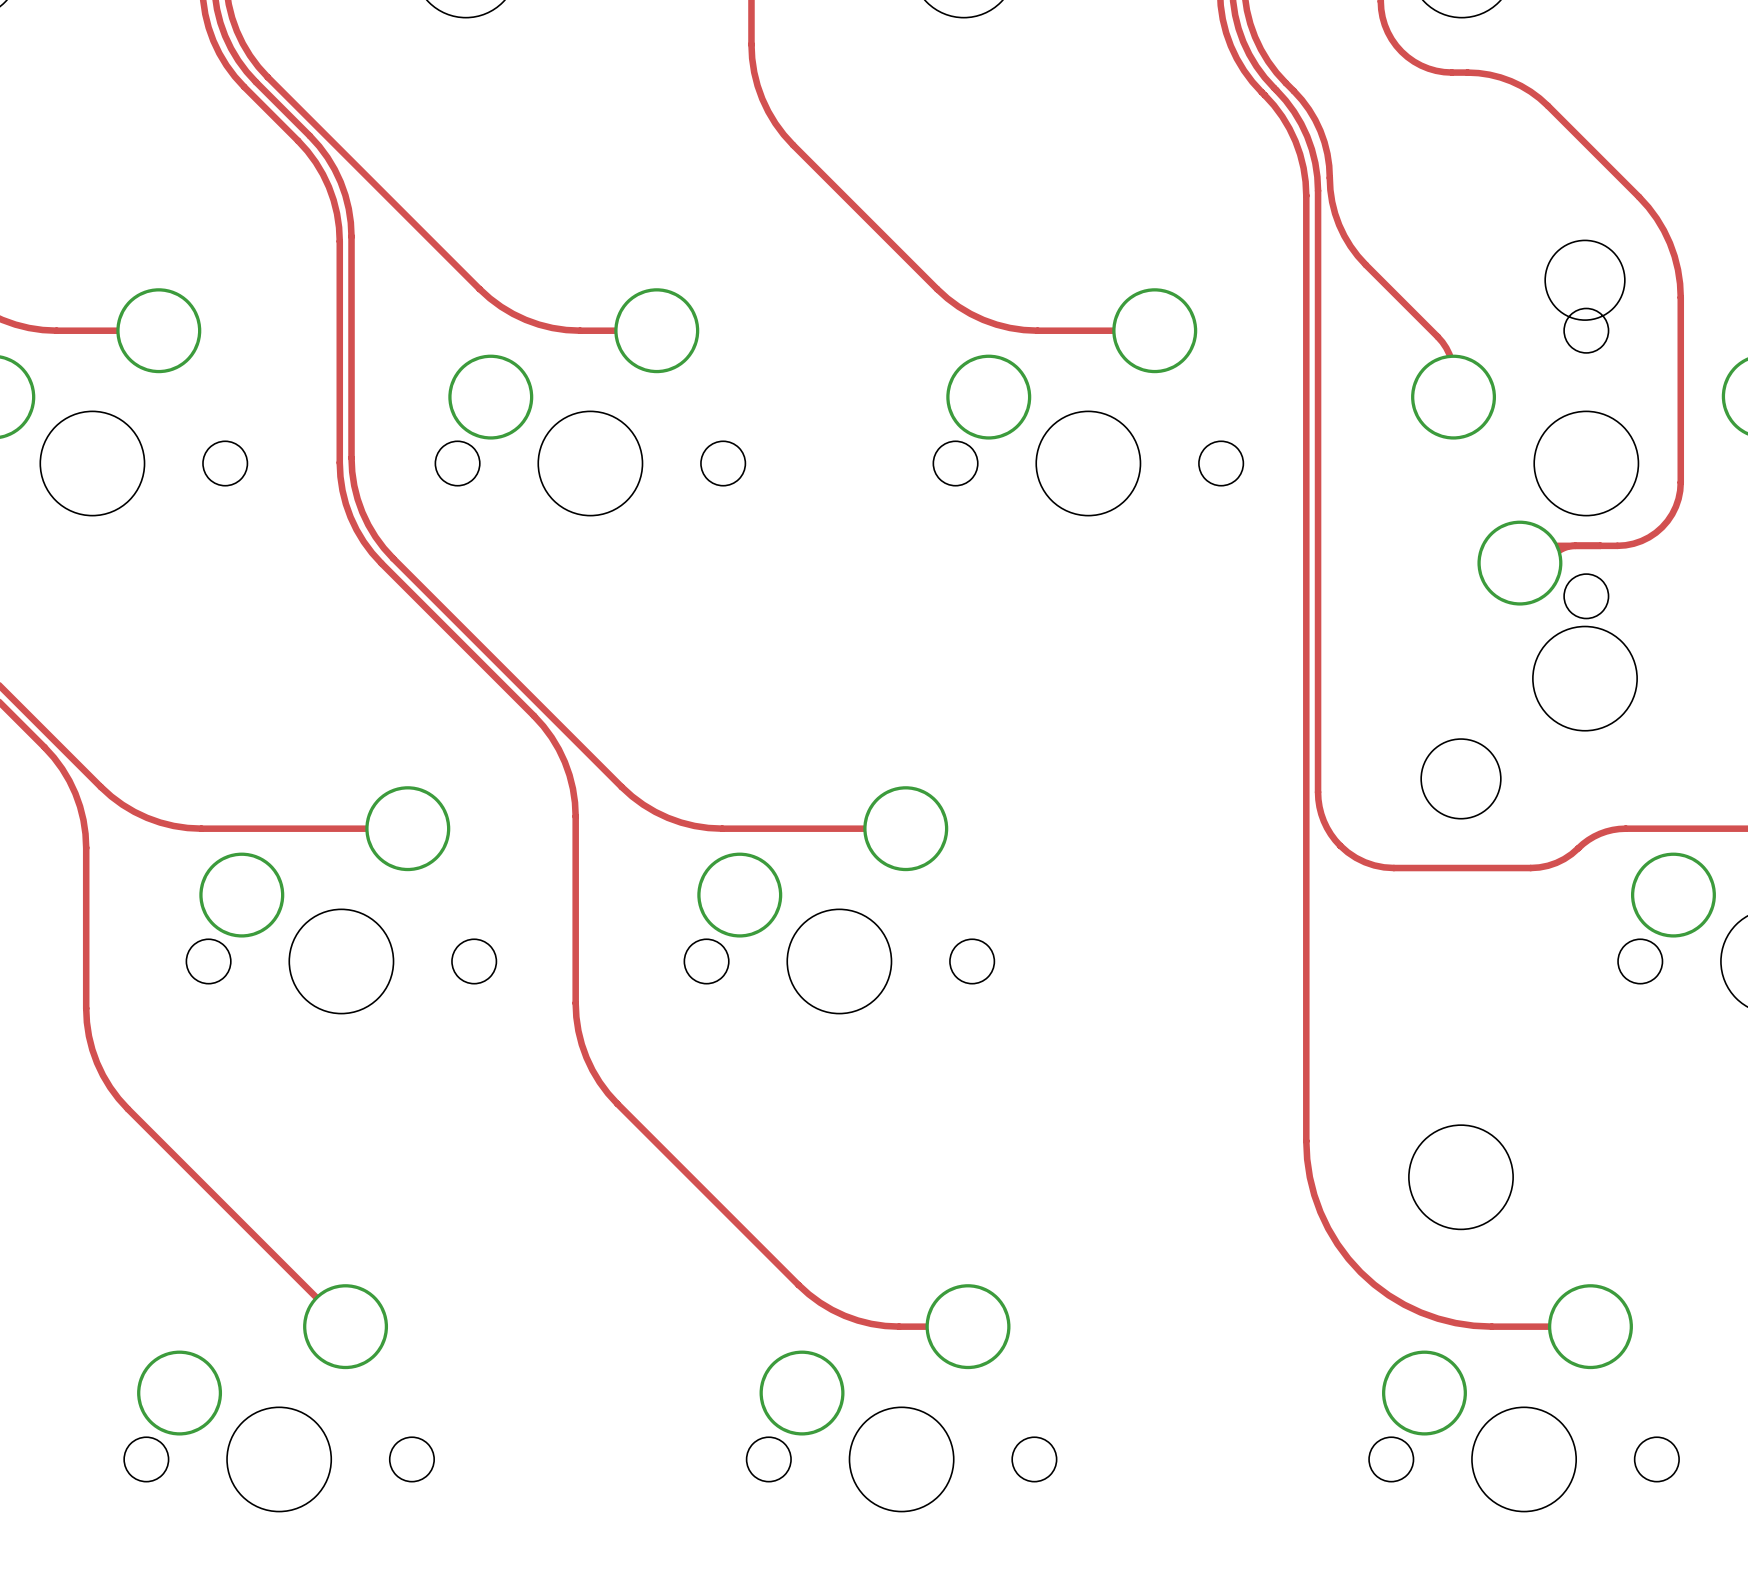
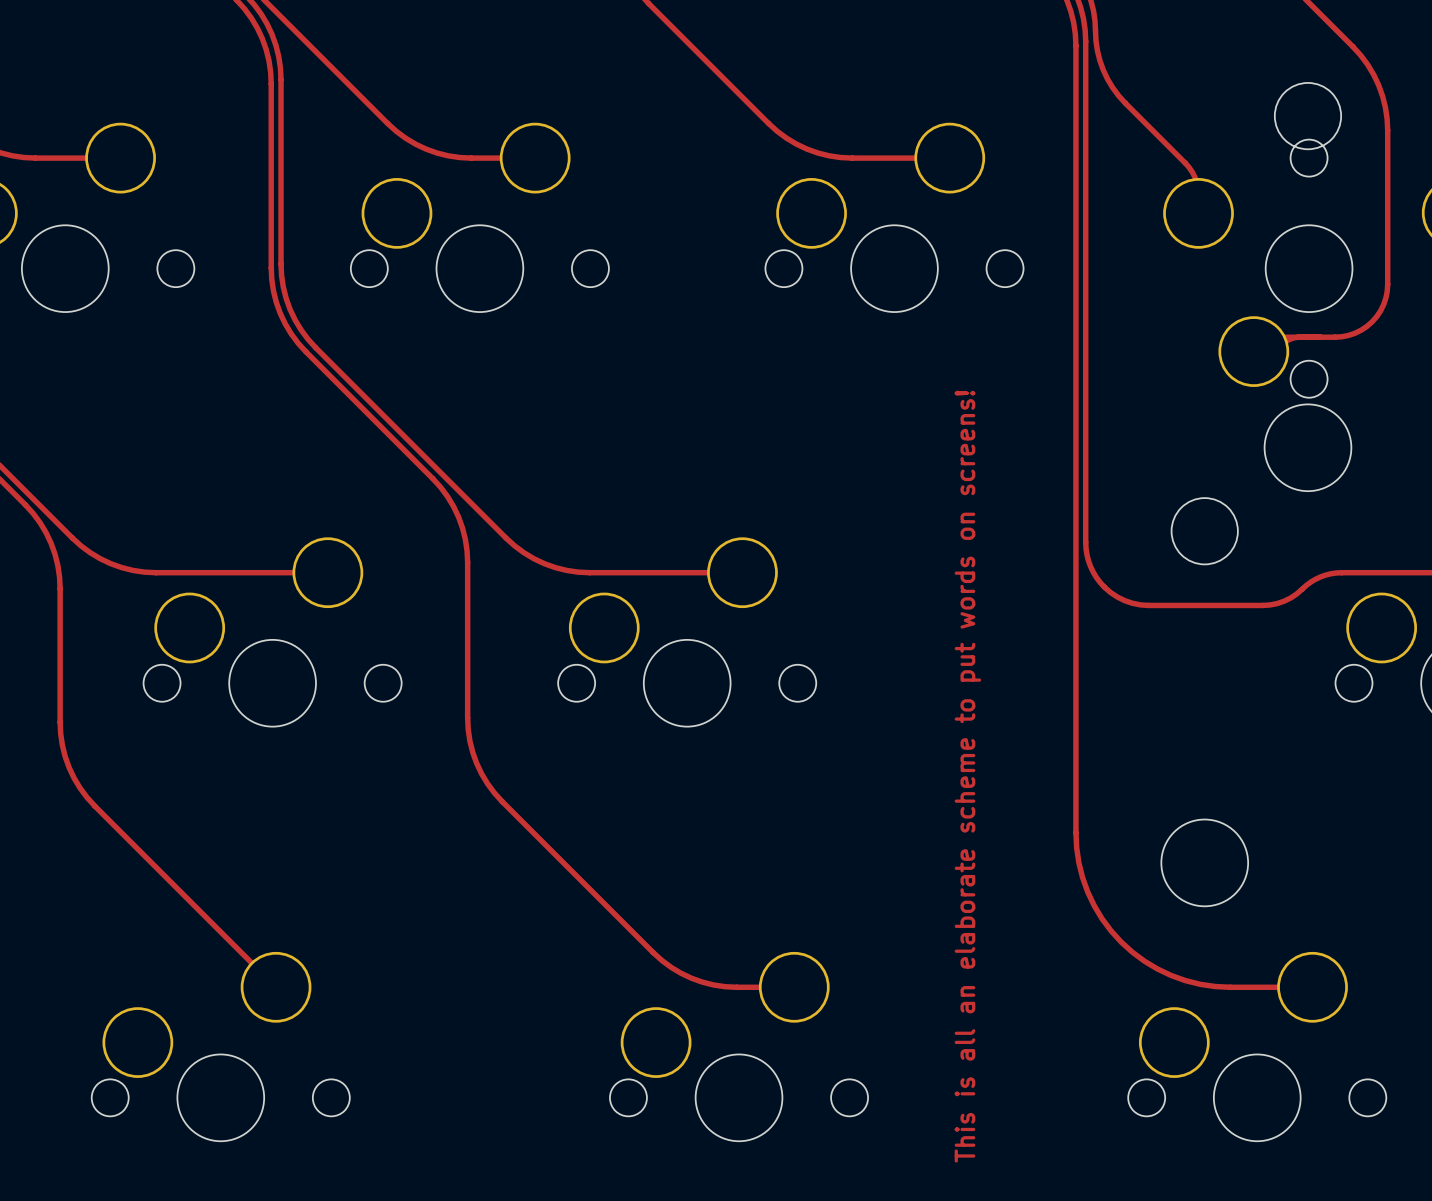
text: none -> This is all an elaborate scheme to put words on screens! (967, 776)

